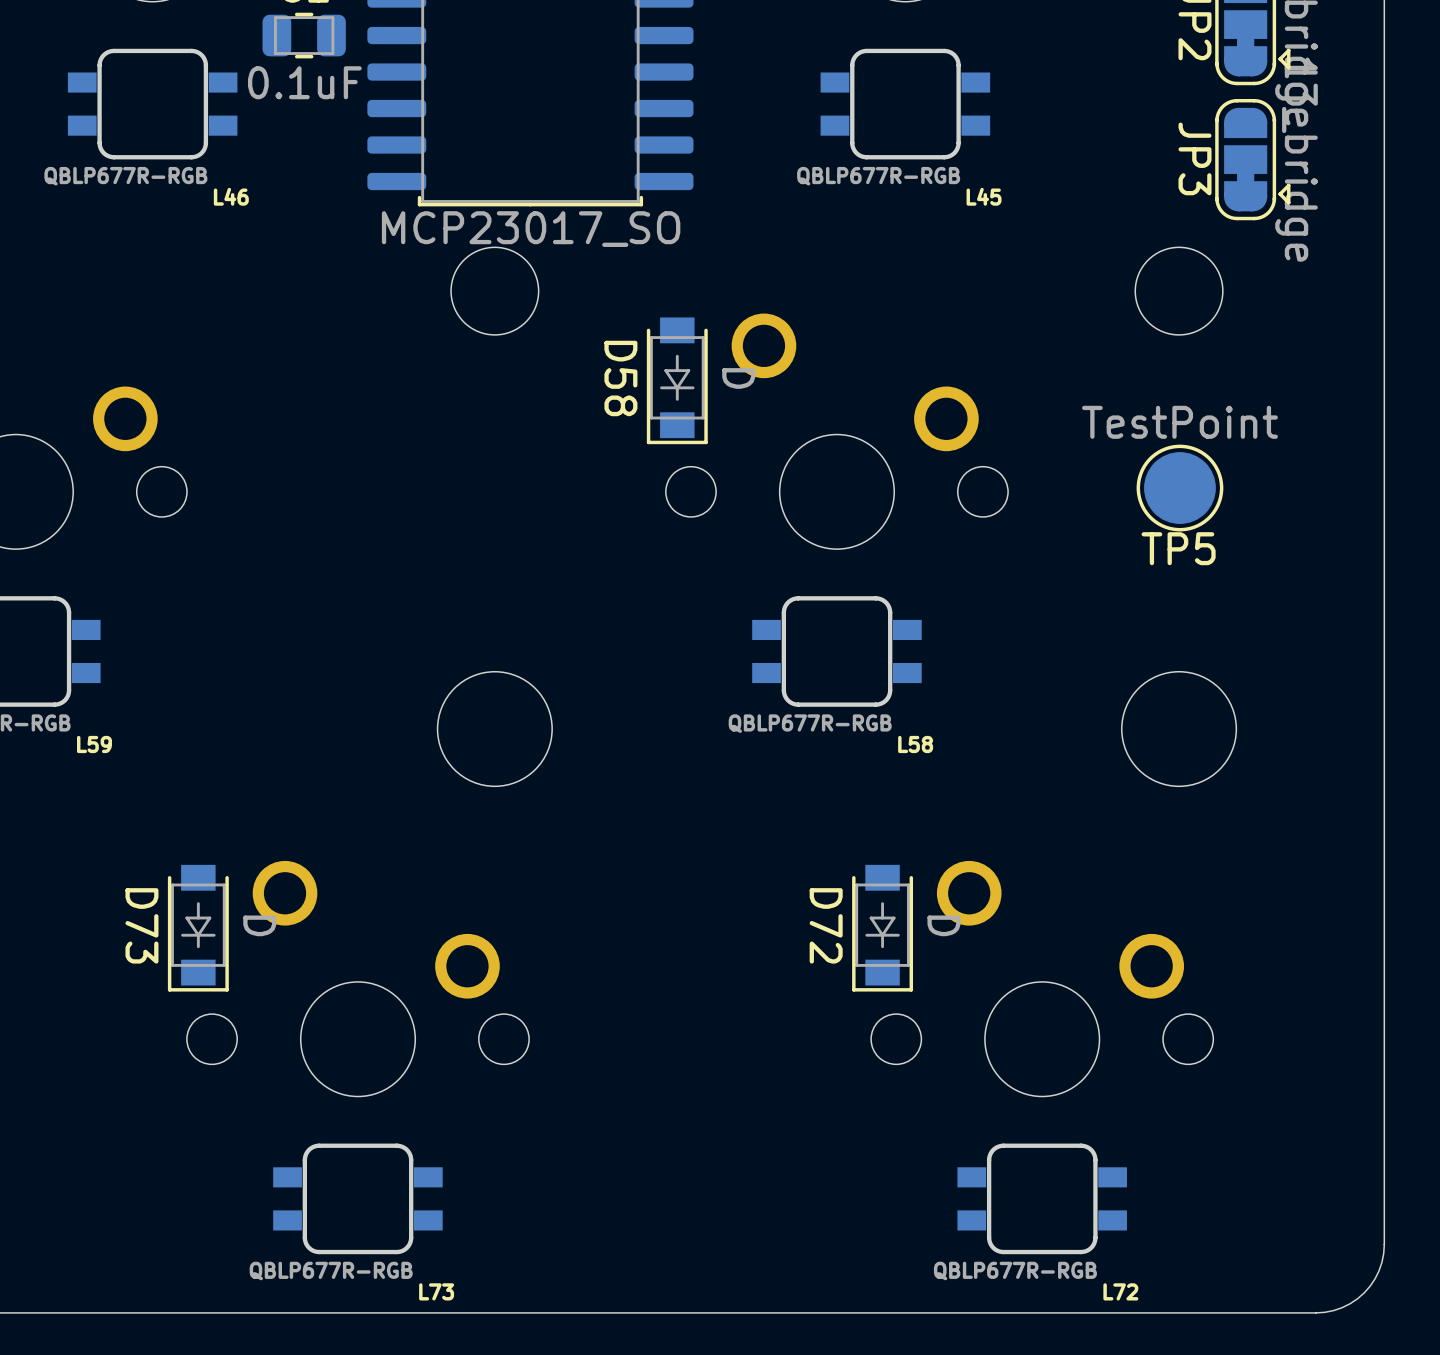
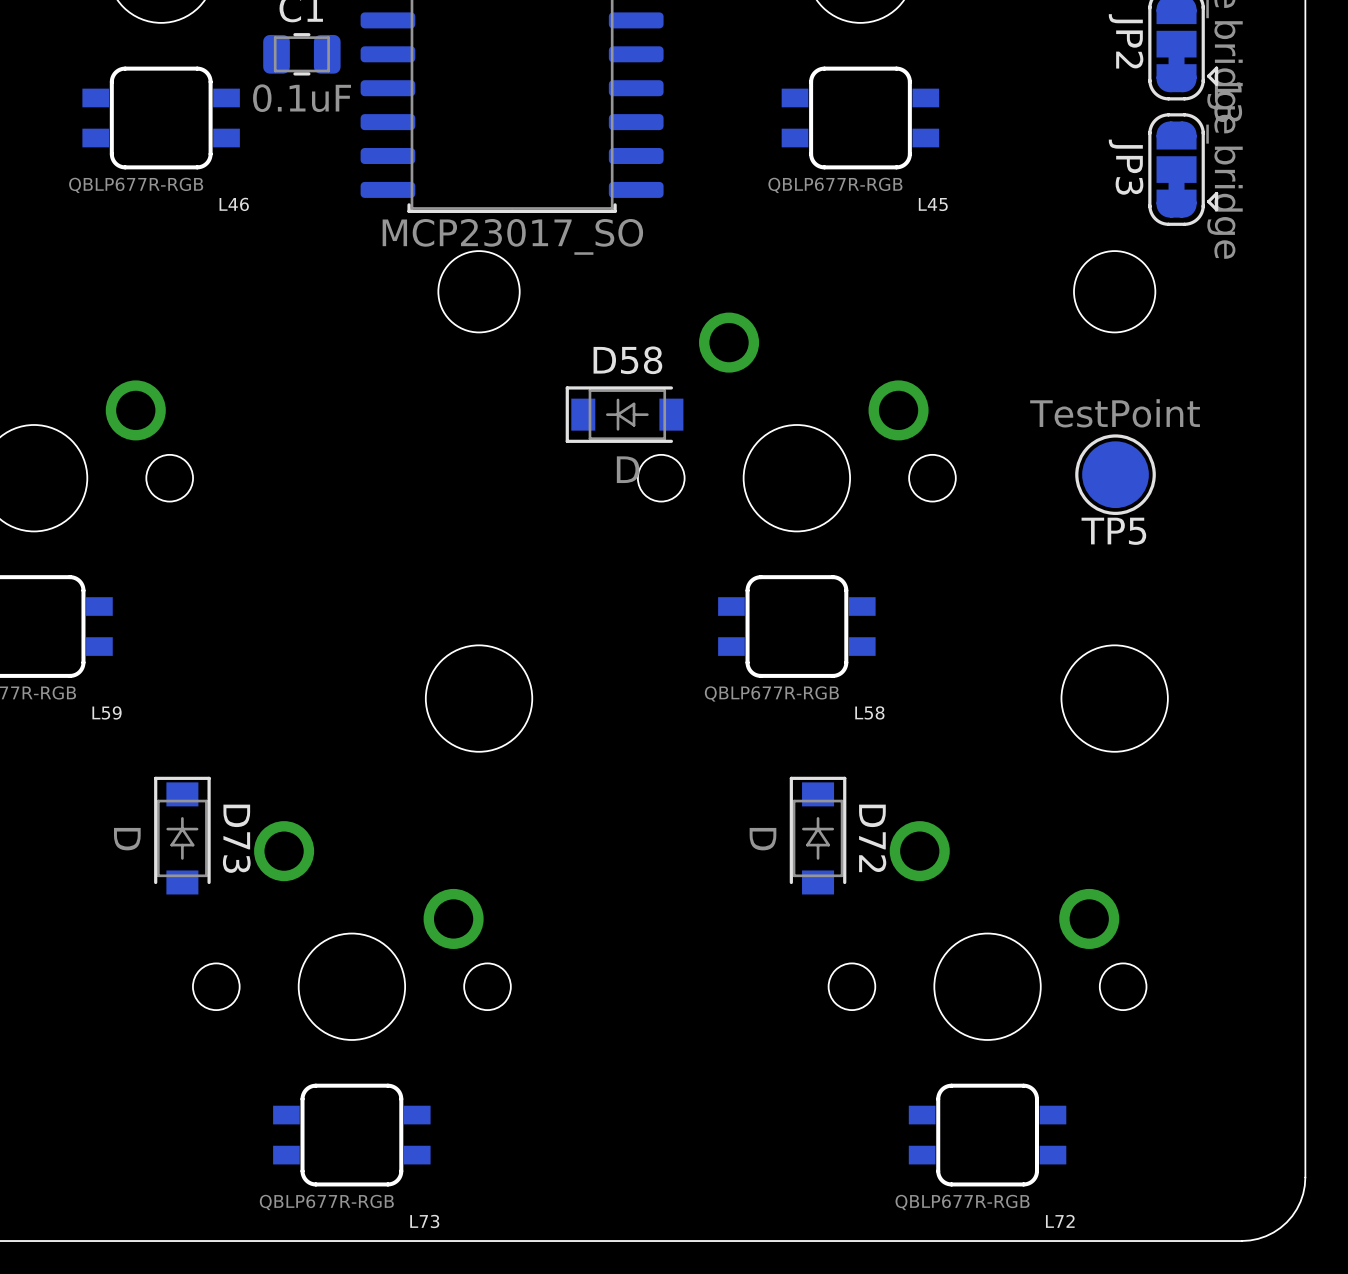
D58 rotation: 0° (677, 380) -> 90° clockwise (624, 414)
D73 rotation: 0° (198, 928) -> 180° (182, 835)
D72 rotation: 0° (882, 928) -> 180° (818, 835)

